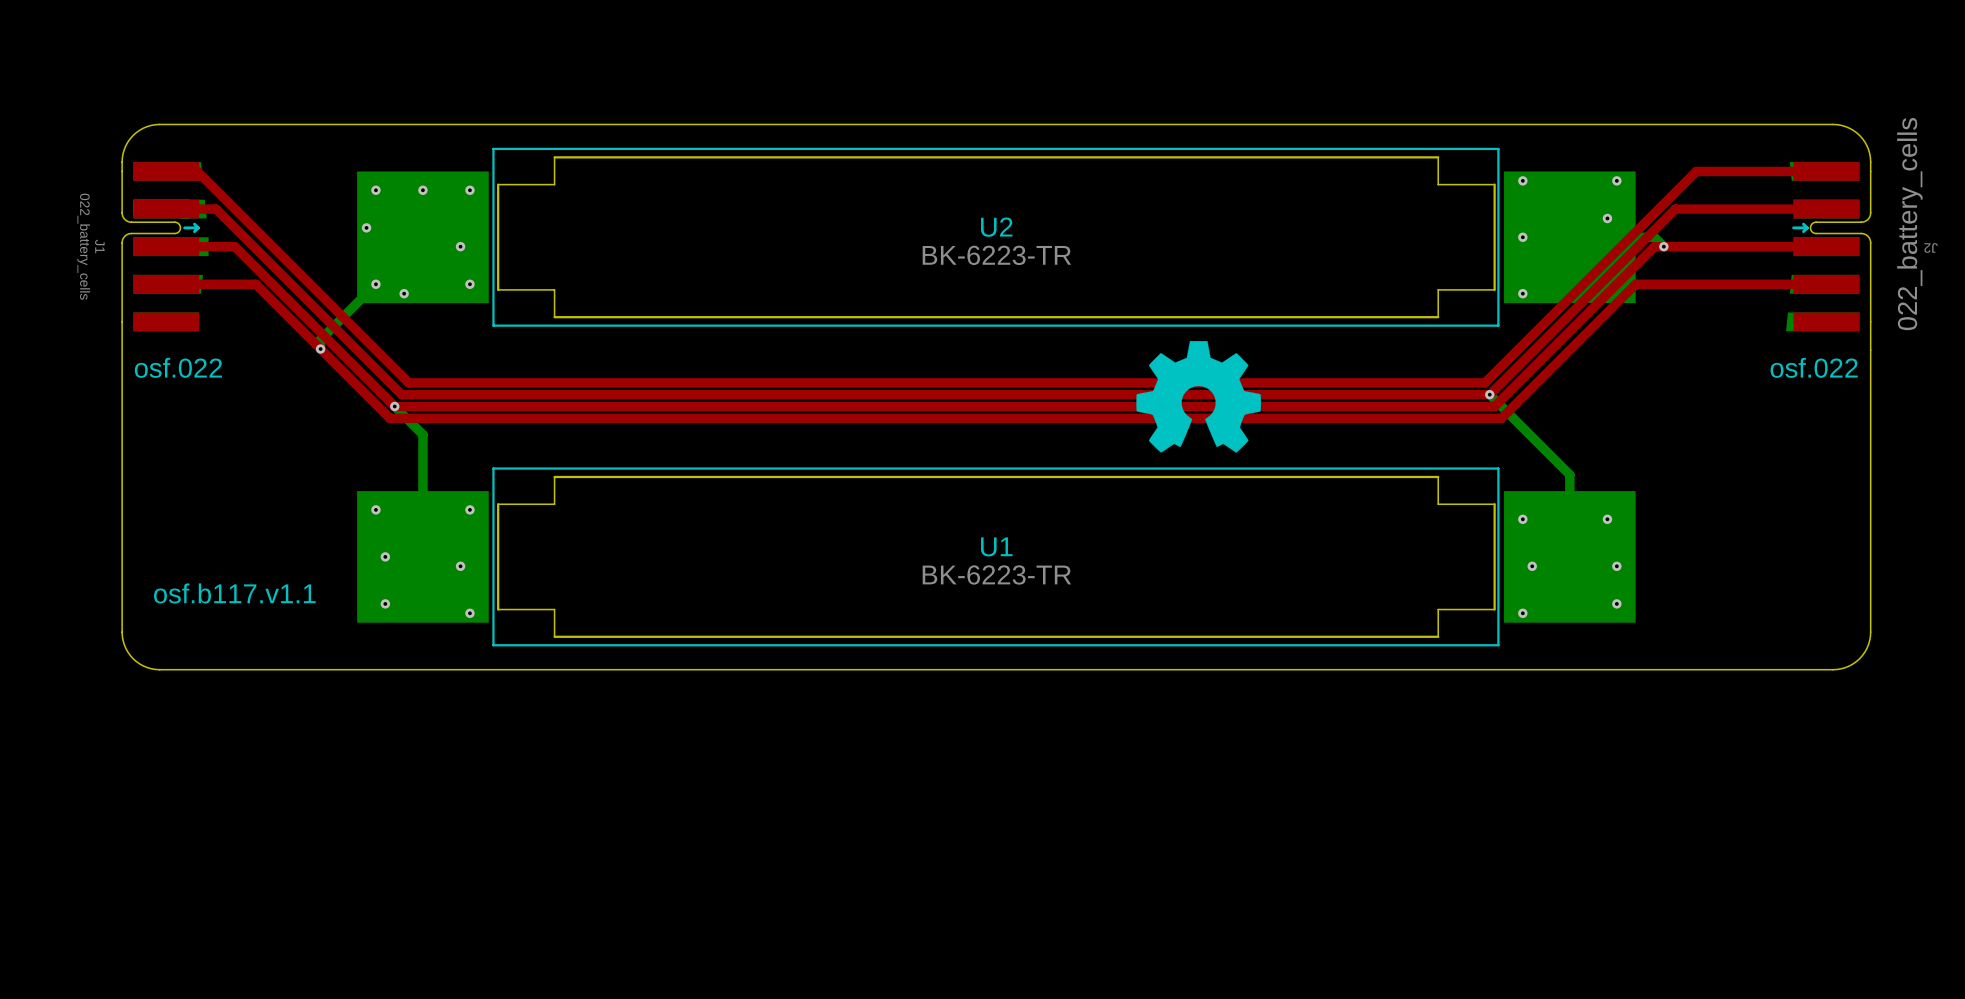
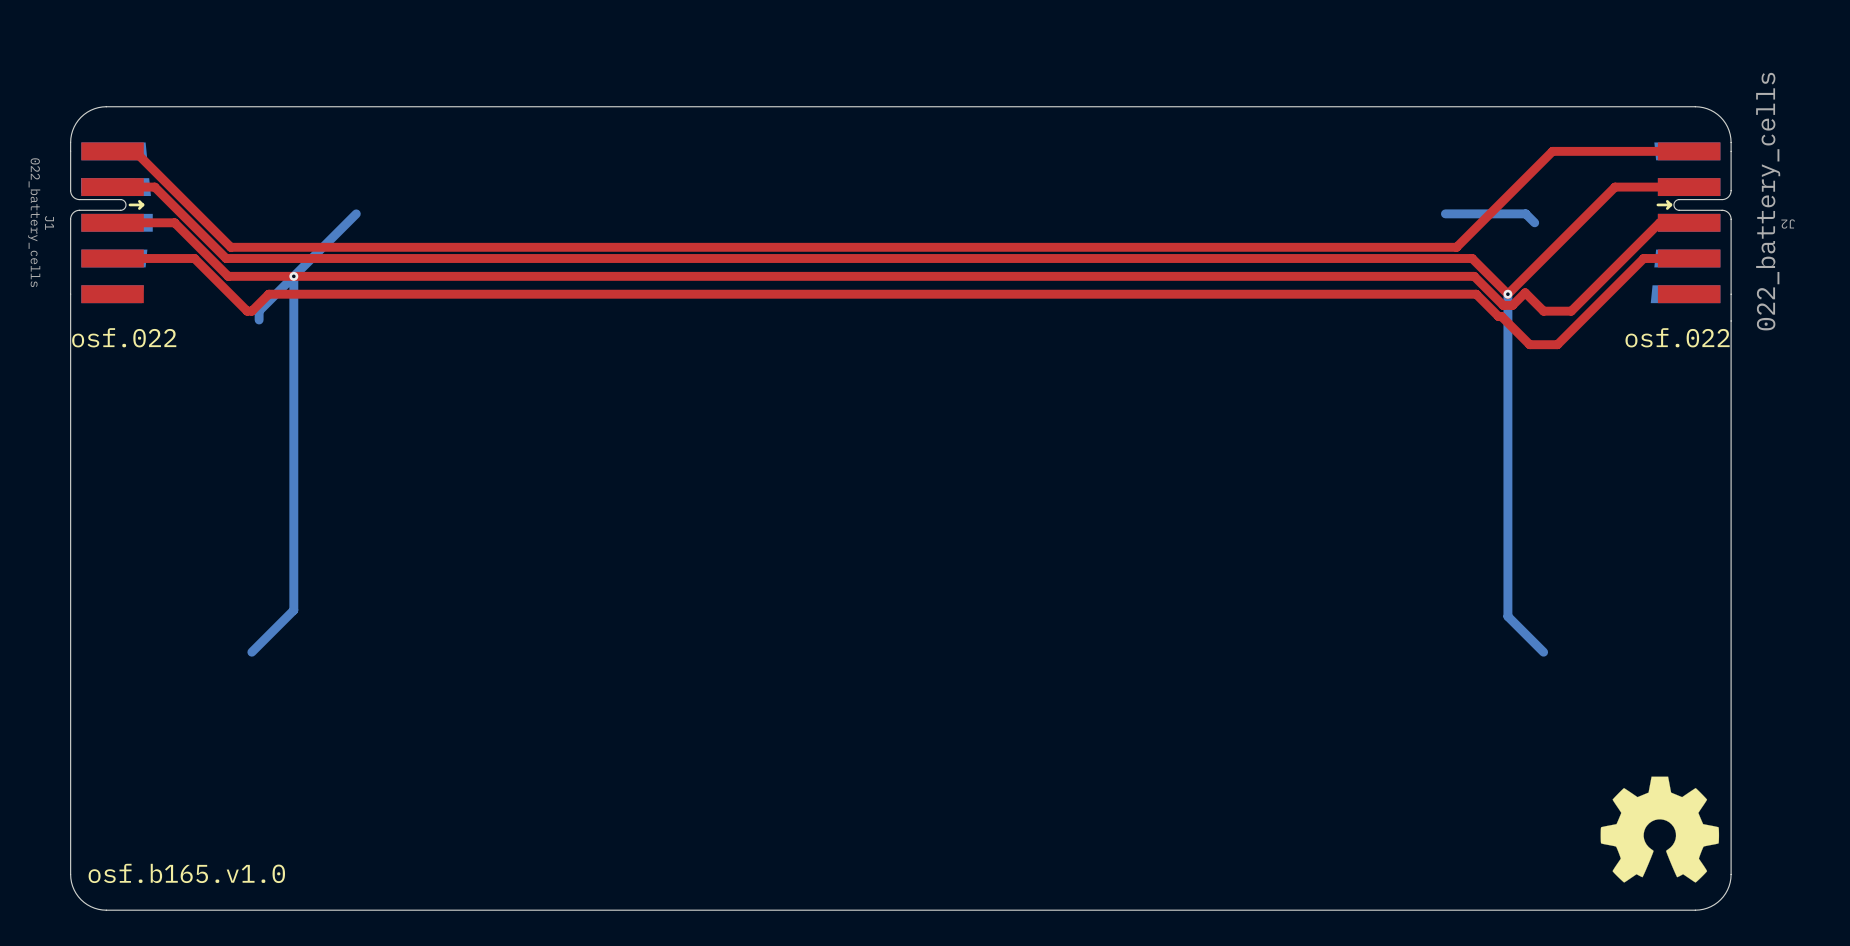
top track: (189, 171) (197, 171) (408, 382) (1484, 382) (1696, 171) -> (134, 151) (230, 247) (1456, 247) (1552, 151) (1565, 151)
via: (1522, 180) -> none
via: (1616, 180) -> none
via: (375, 190) -> none
via: (422, 190) -> none
via: (469, 190) -> none
top track: (210, 209) (216, 209) (401, 394) (1489, 394) (1675, 209) (1748, 209) -> (154, 187) (226, 258) (1472, 258) (1507, 294) (1615, 187)
via: (1607, 218) -> none
via: (366, 227) -> none
U2: BK-6223-TR (996, 237) -> none
via: (1522, 237) -> none
top track: (231, 246) (234, 246) (394, 406) (1494, 406) (1654, 246) (1795, 246) -> (174, 222) (228, 276) (1474, 276) (1503, 305) (1512, 305) (1525, 292) (1543, 311) (1571, 311) (1659, 222)
via: (460, 246) -> none
via: (1663, 246) -> none
top track: (252, 284) (255, 284) (389, 418) (1501, 418) (1635, 284) (1778, 284) -> (194, 258) (247, 311) (251, 311) (268, 294) (1476, 294) (1529, 344) (1557, 344) (1643, 258)
via: (375, 284) -> none
via: (469, 284) -> none
via: (404, 293) -> none
via: (1522, 293) -> none
bottom track: none -> (293, 276) (293, 610) (251, 652)
via: none -> (293, 276)
bottom track: none -> (1507, 294) (1507, 616) (1543, 652)
via: none -> (1507, 294)
drawing: [1136, 341, 1262, 453] -> none
via: (320, 349) -> none
bottom track: (1489, 394) (1569, 474) (1569, 556) -> none
via: (1489, 394) -> none
bottom track: (394, 406) (422, 434) (422, 556) -> none
via: (394, 406) -> none
via: (375, 509) -> none
via: (469, 509) -> none
via: (1522, 519) -> none
via: (1607, 519) -> none
via: (385, 556) -> none
U1: BK-6223-TR (996, 556) -> none
via: (460, 566) -> none
via: (1532, 566) -> none
via: (1616, 566) -> none
text: osf.b117.v1.1 (234, 593) -> none
via: (385, 603) -> none
via: (1616, 603) -> none
via: (469, 613) -> none
via: (1522, 613) -> none
board edge: (122, 632) (125, 648) (133, 658) (143, 665) (159, 669) (1833, 669) (1845, 667) (1859, 658) (1866, 648) (1870, 632) -> (70, 588) (70, 878) (74, 889) (81, 899) (90, 906) (106, 910) (1703, 909) (1720, 899) (1727, 889) (1730, 878) (1731, 588)
drawing: none -> [1600, 776, 1720, 883]
text: none -> osf.b165.v1.0 (186, 873)

